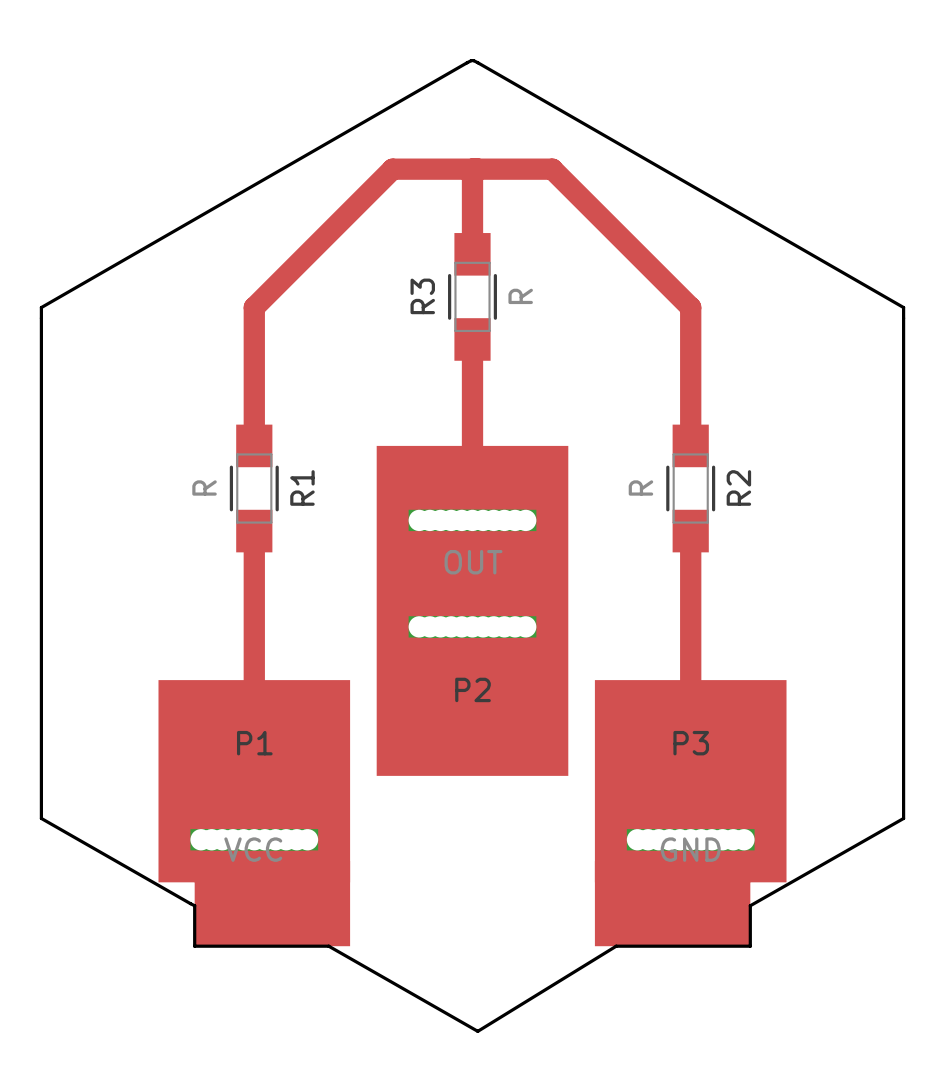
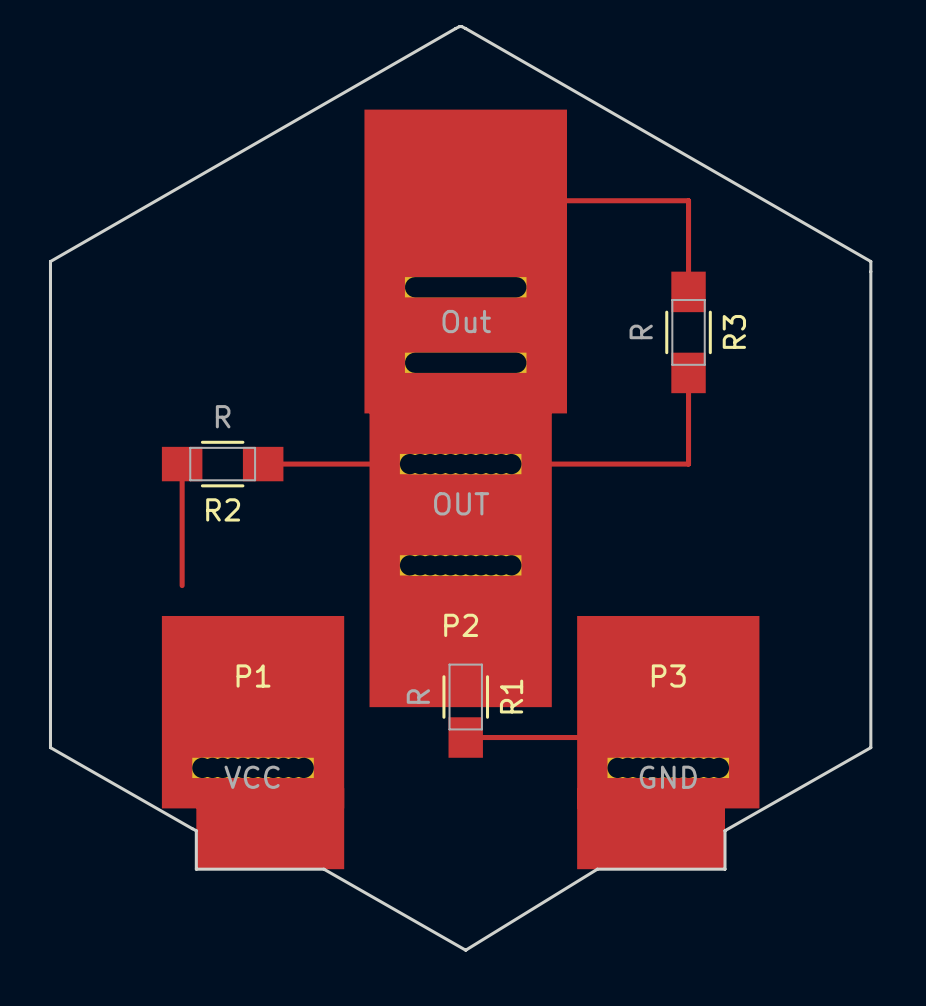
top track: (472, 169) (472, 254) -> none
top track: none -> (526, 200) (688, 200) (688, 291)
R3 name position: R3 (422, 296) -> R3 (734, 331)
R3 position: (472, 296) -> (688, 332)
R3 value position: R (520, 296) -> R (641, 331)
part: none -> Out (465, 261)
top track: (472, 339) (472, 472) -> none
top track: none -> (688, 372) (688, 464) (263, 464)
top track: (254, 445) (254, 307) (392, 169) (552, 169) (690, 307) (690, 445) -> none
R1 position: (254, 488) -> (465, 697)
R2 rotation: 0° (690, 488) -> 90° clockwise (222, 464)
R2 position: (690, 488) -> (222, 464)
top track: none -> (182, 464) (182, 585)
top track: (254, 531) (254, 717) -> none
top track: (690, 531) (690, 717) -> none
top track: none -> (465, 737) (577, 737)

